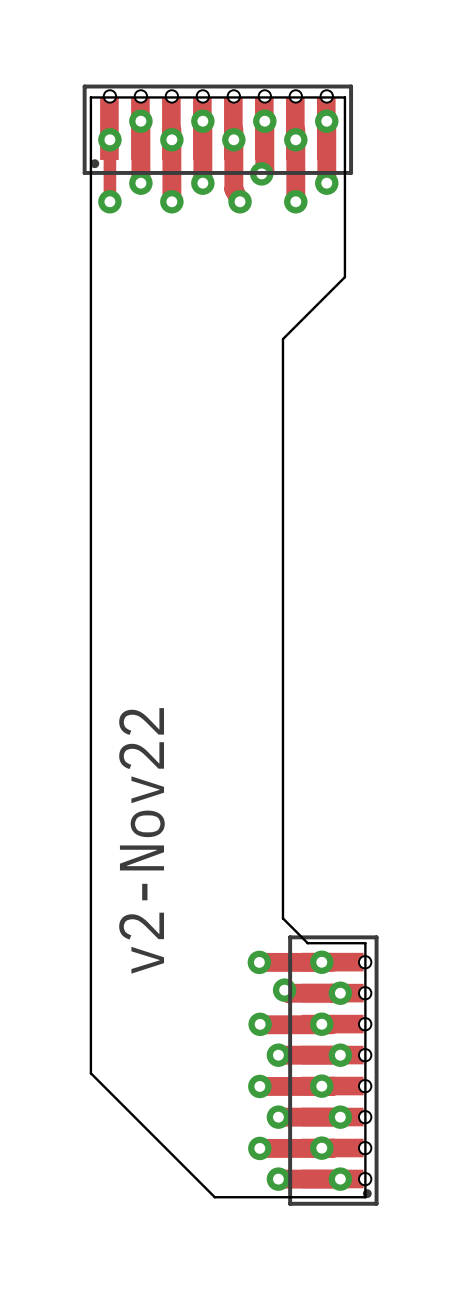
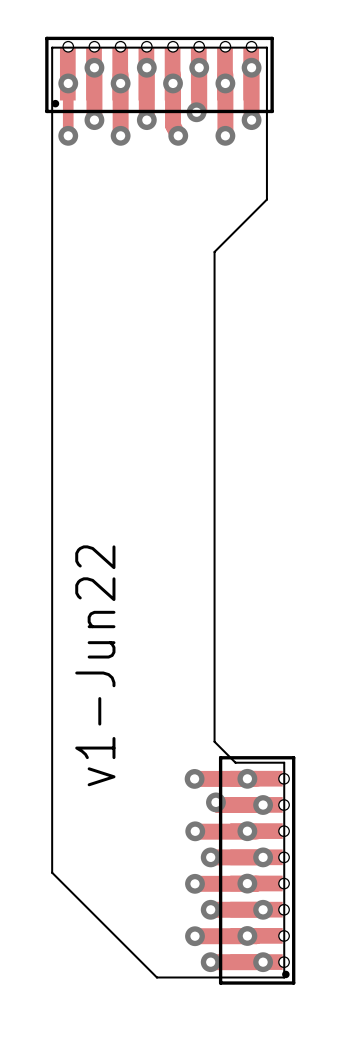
text: v2-Nov22 (141, 840) -> v1-Jun22 (95, 665)

